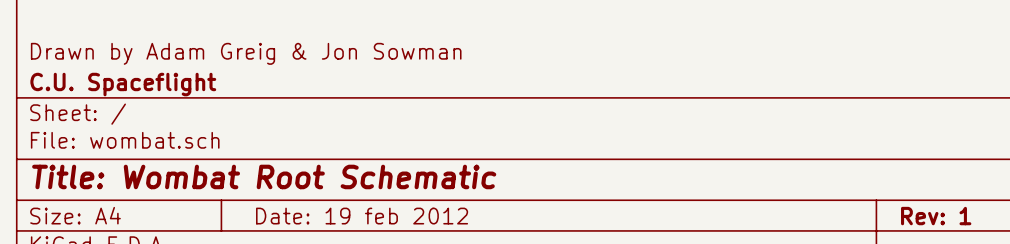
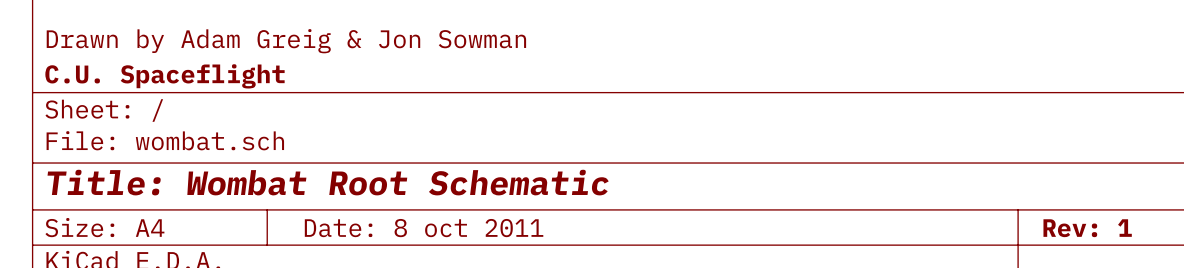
title block: Date: 19 feb 2012 (362, 216) -> Date: 8 oct 2011 (424, 228)

